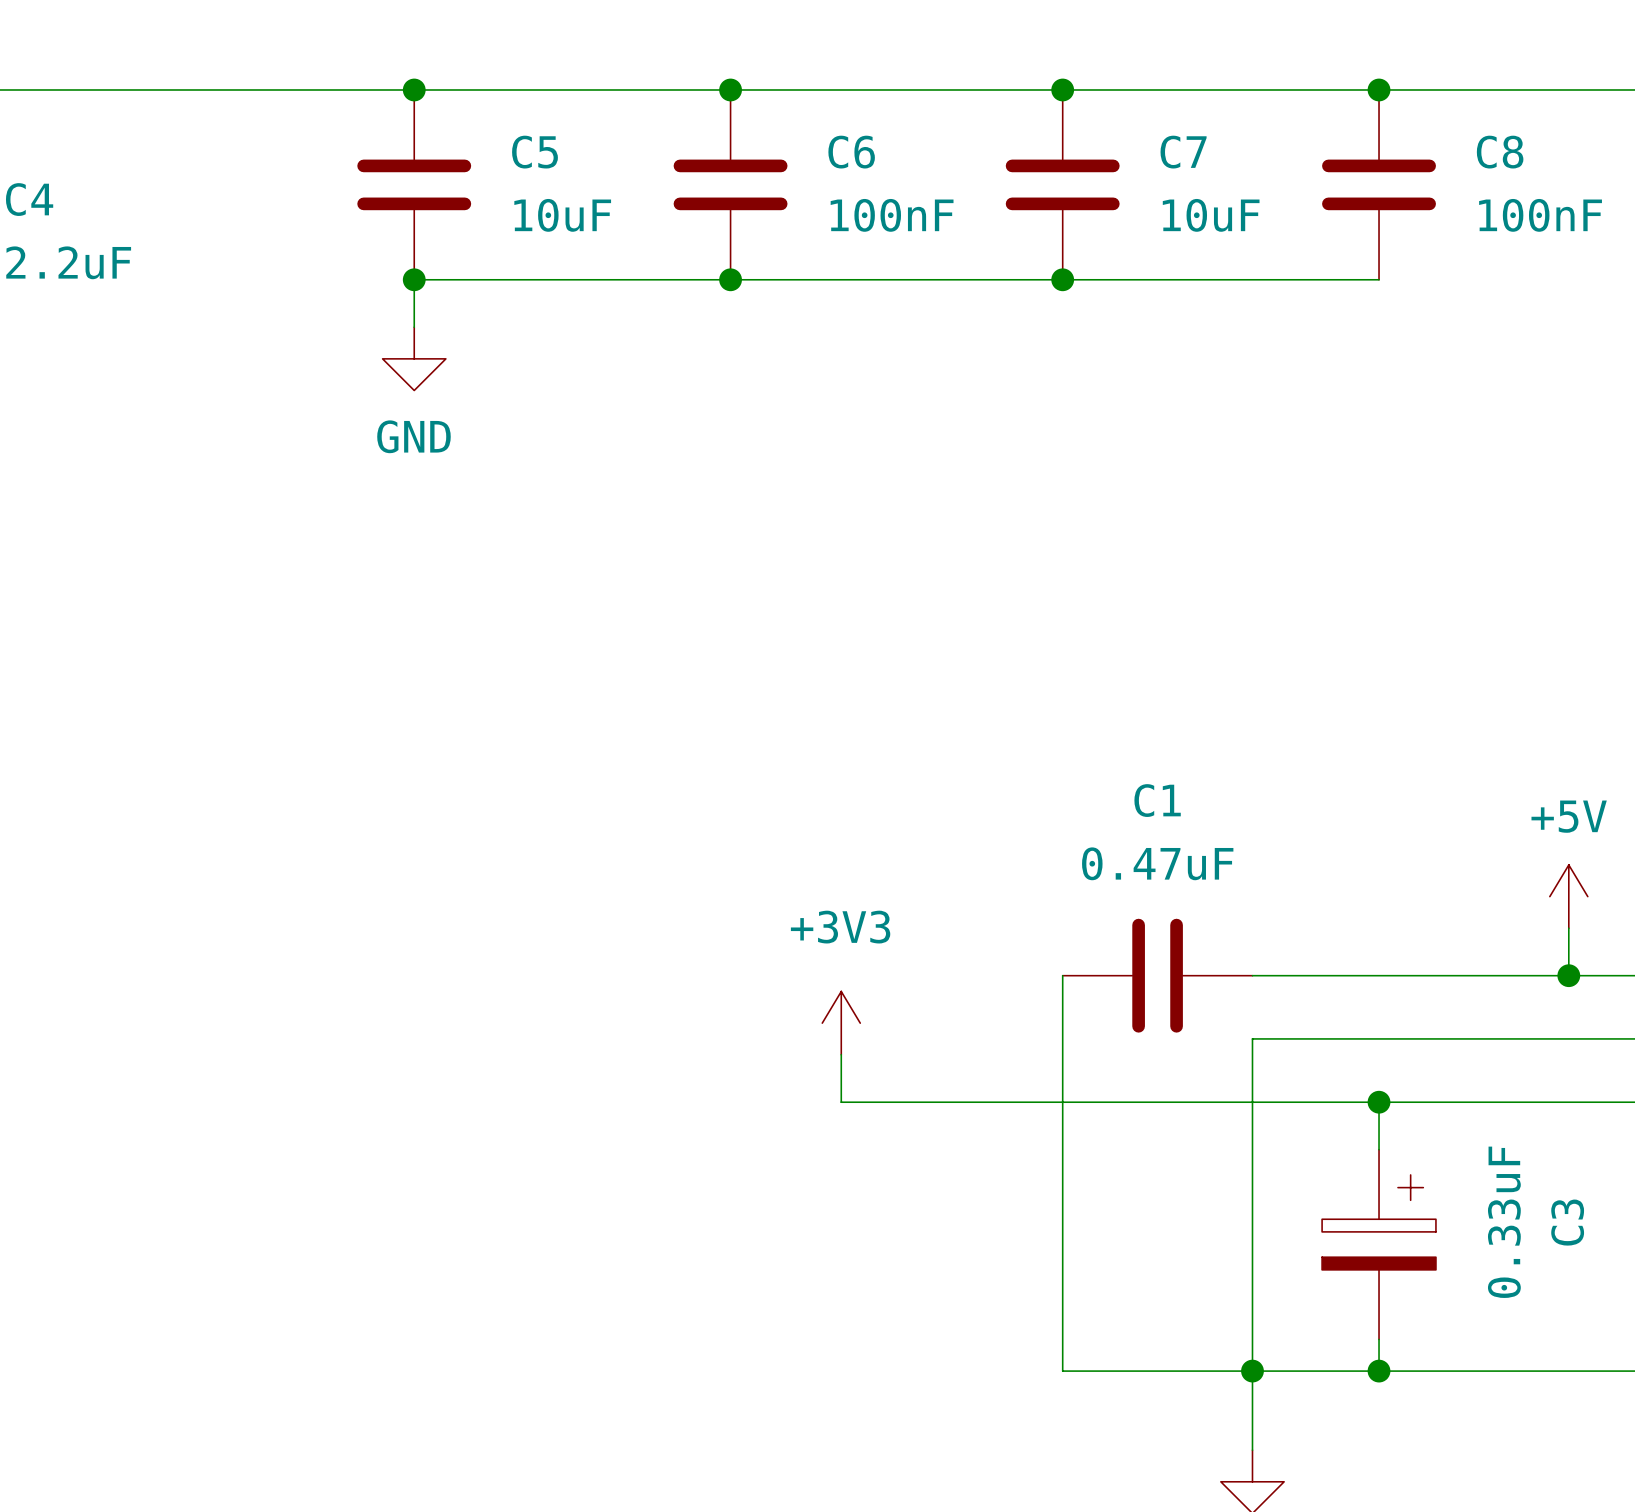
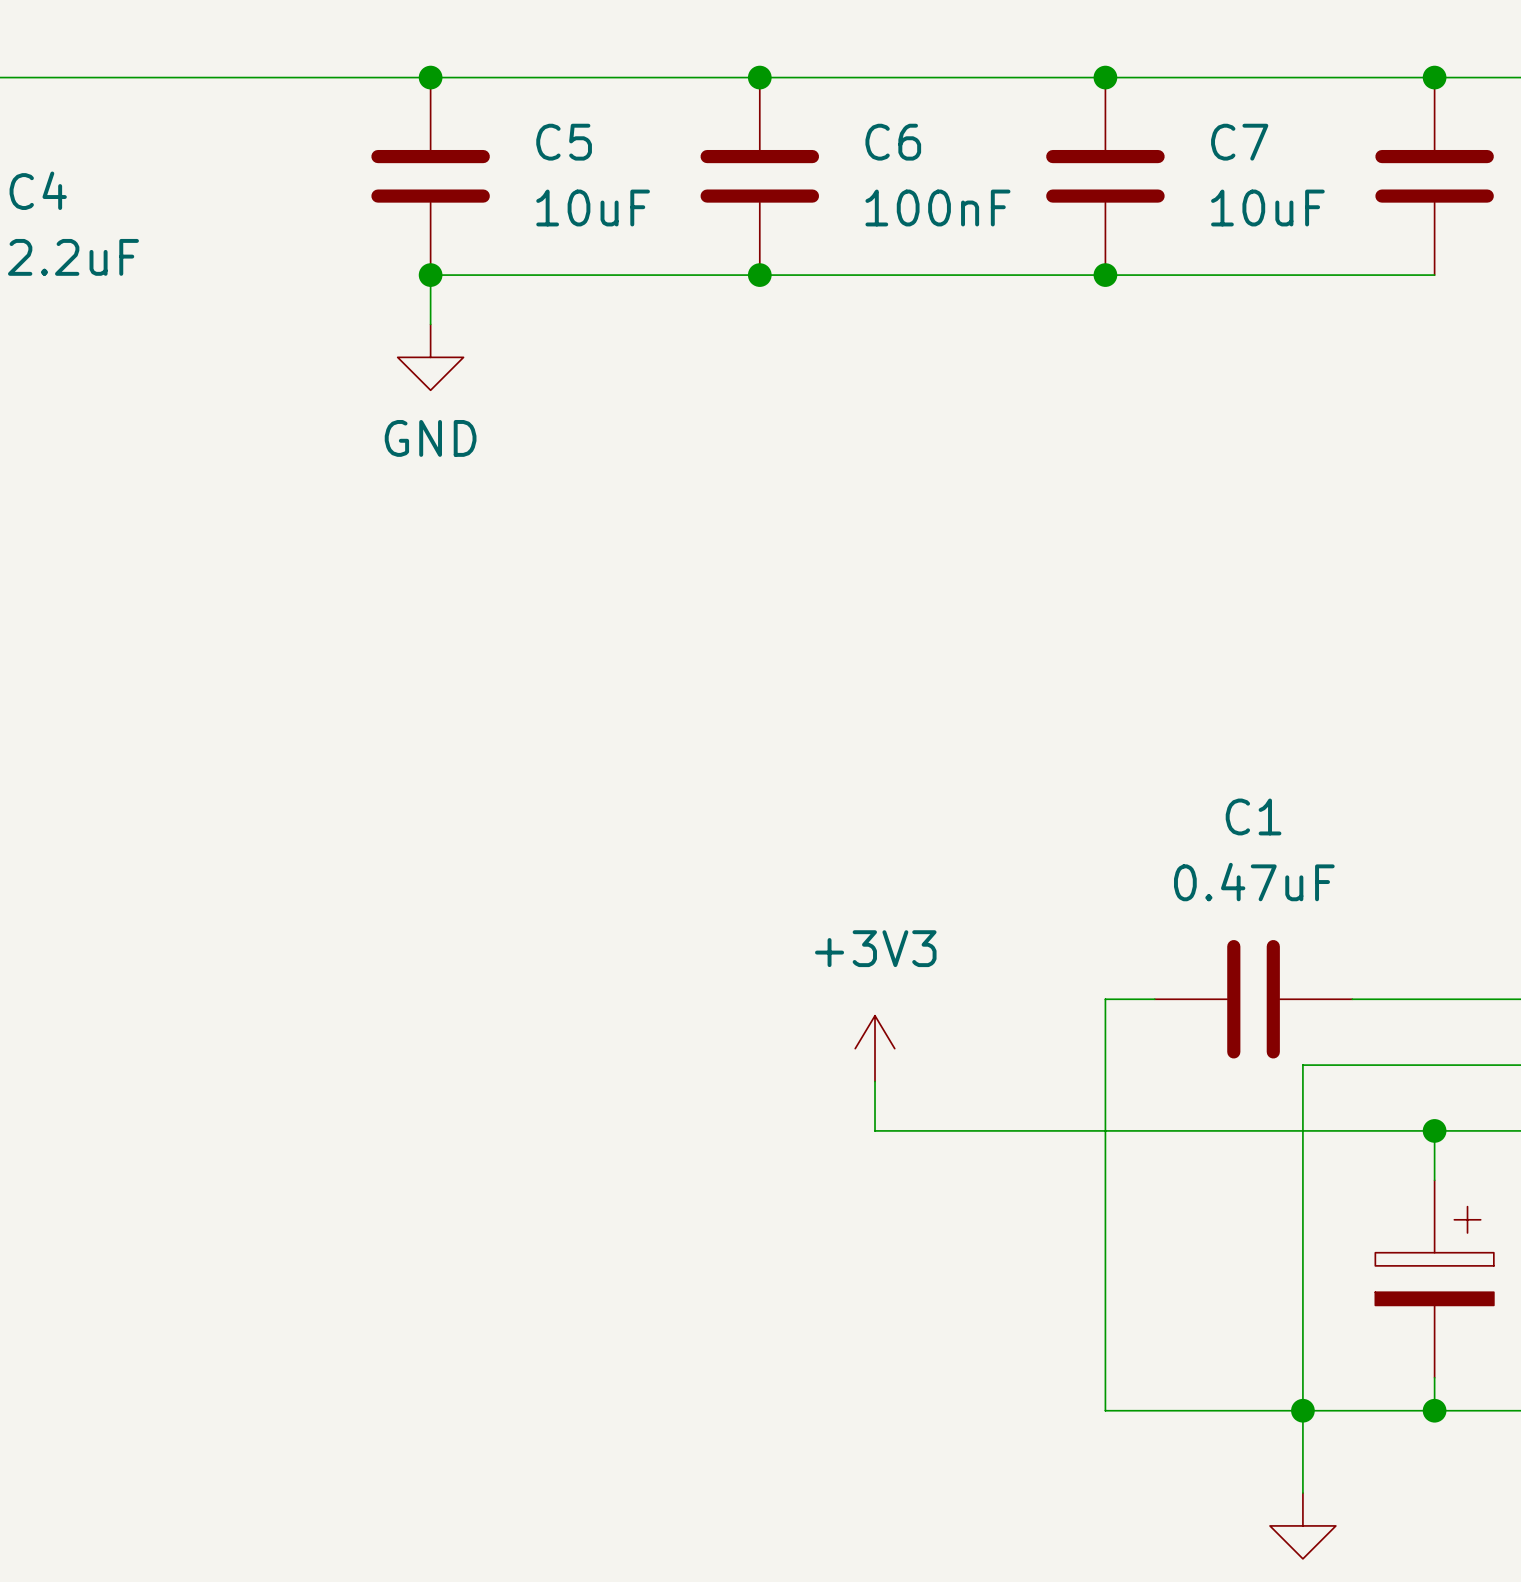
C1 position: (1157, 975) -> (1253, 999)

